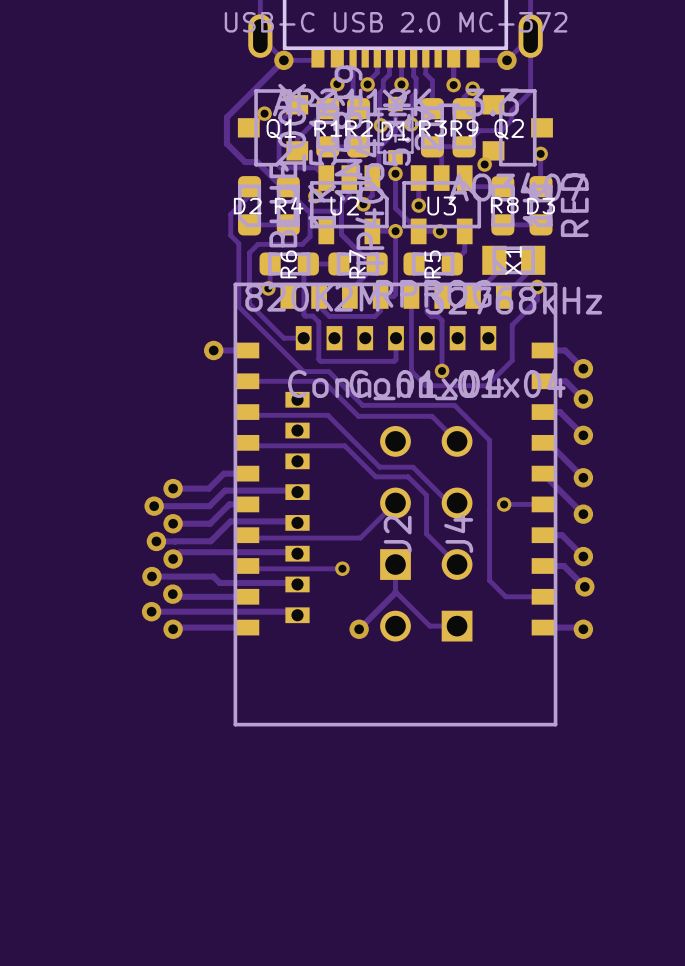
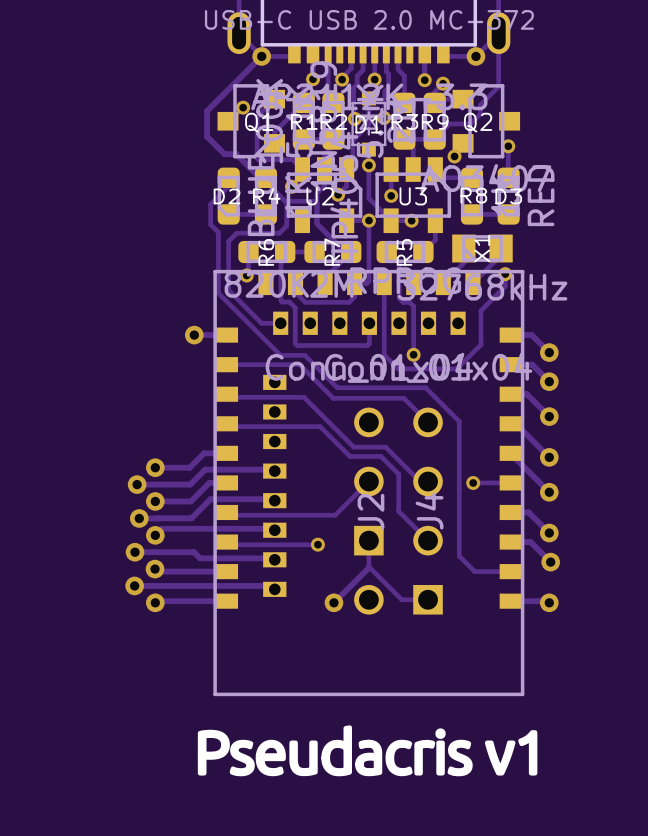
drawing: none -> [197, 725, 538, 777]

